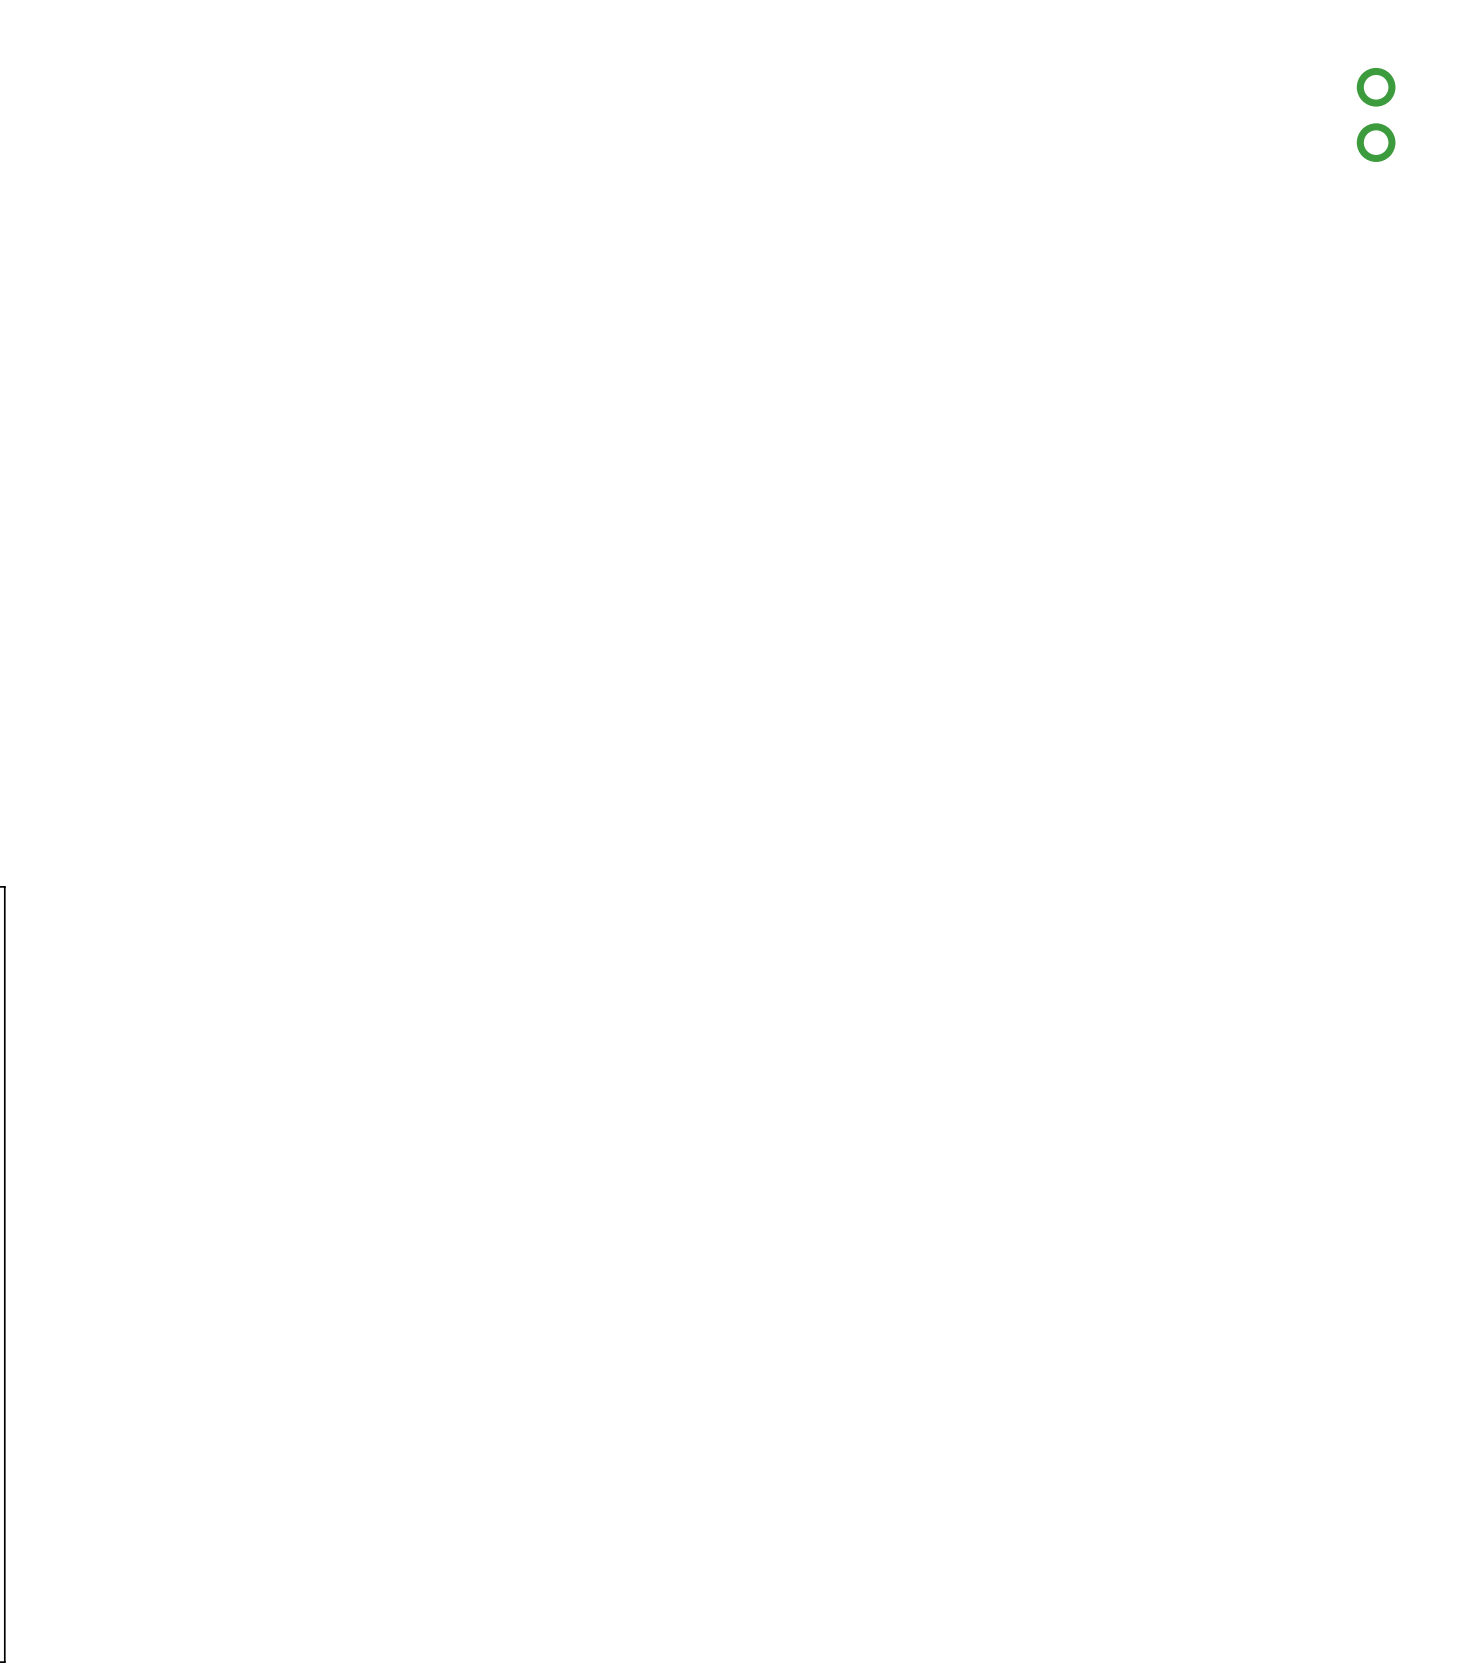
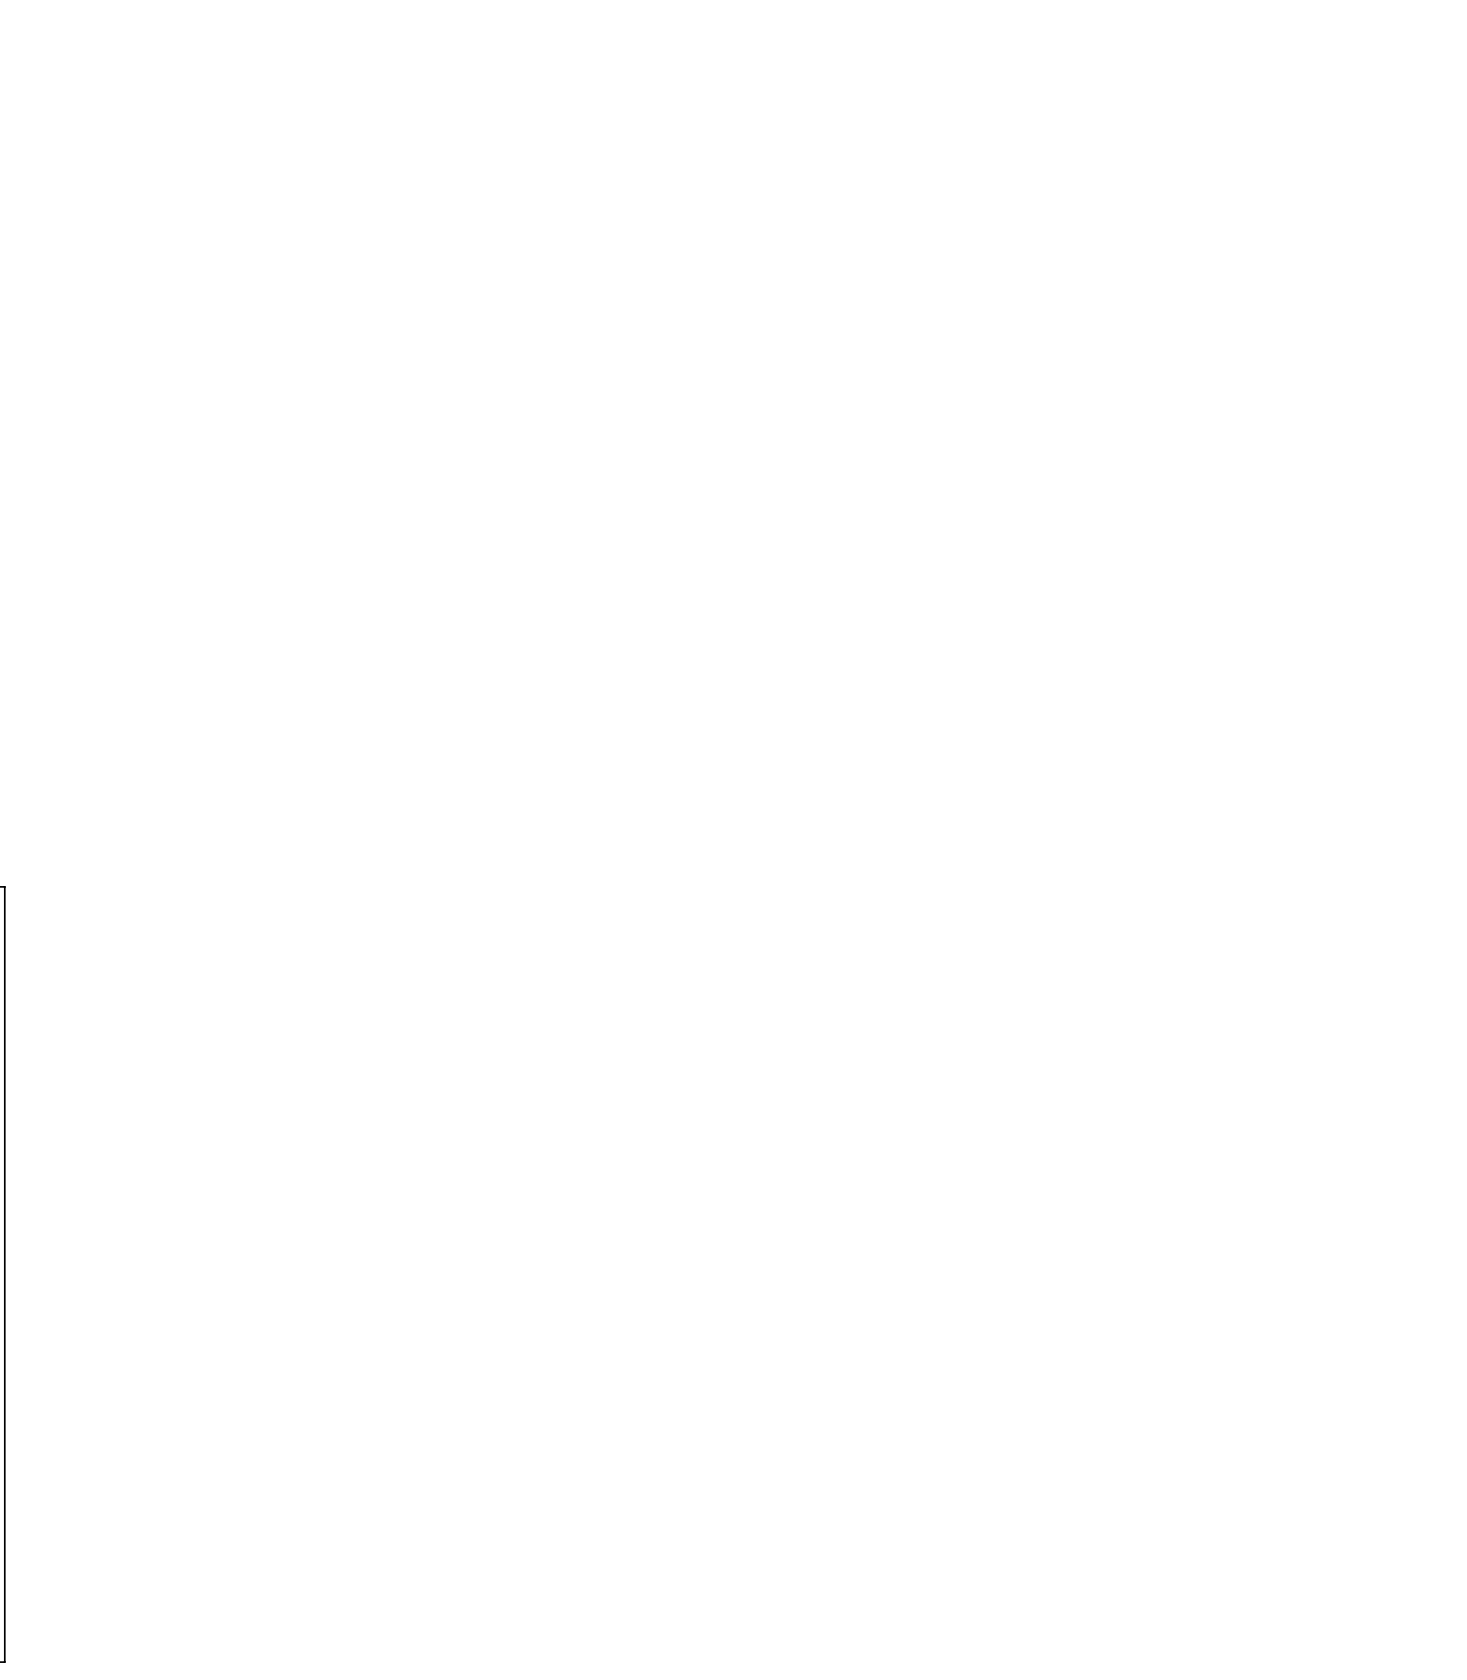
part: (1376, 114) -> none

